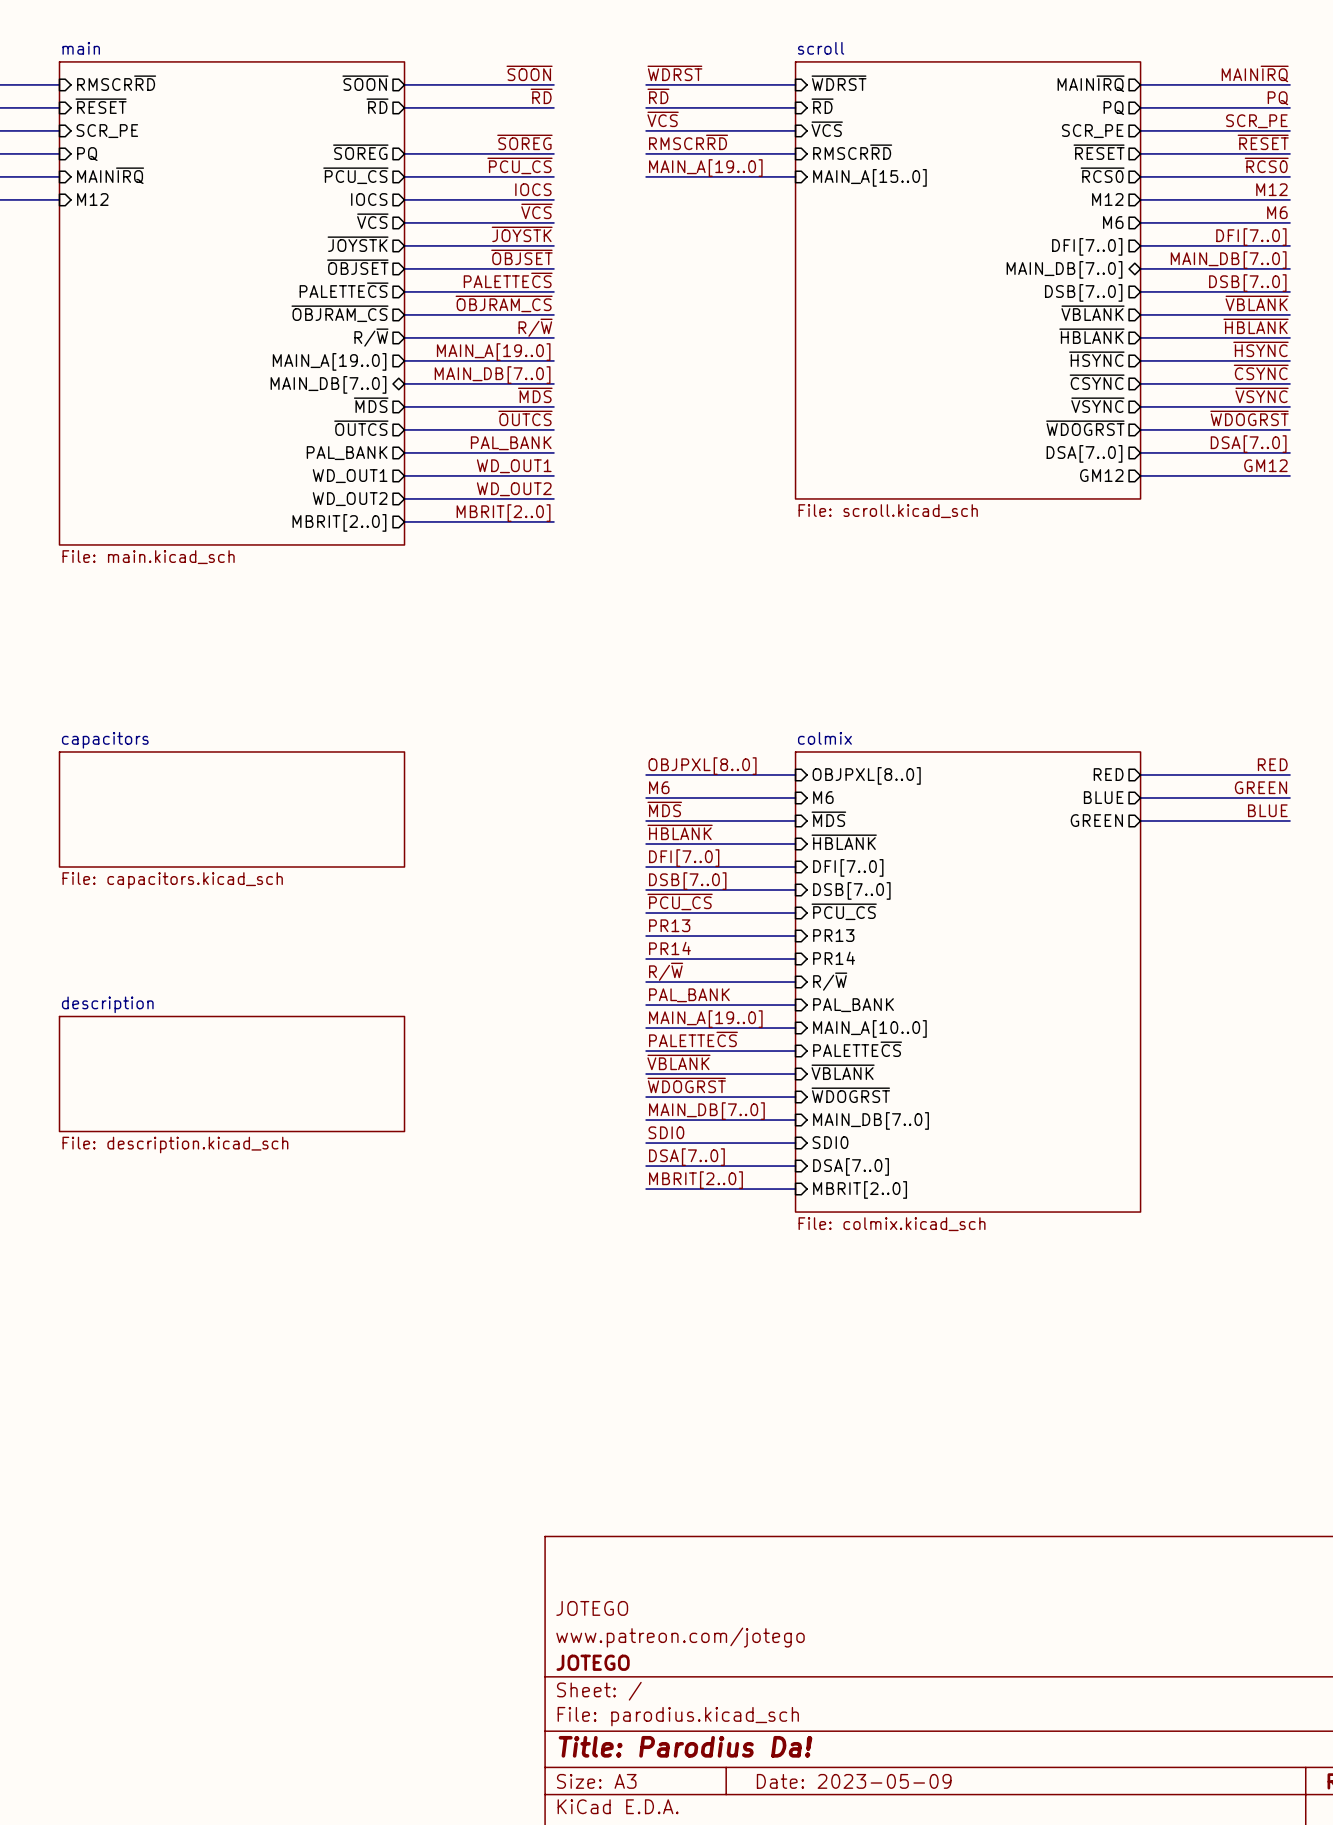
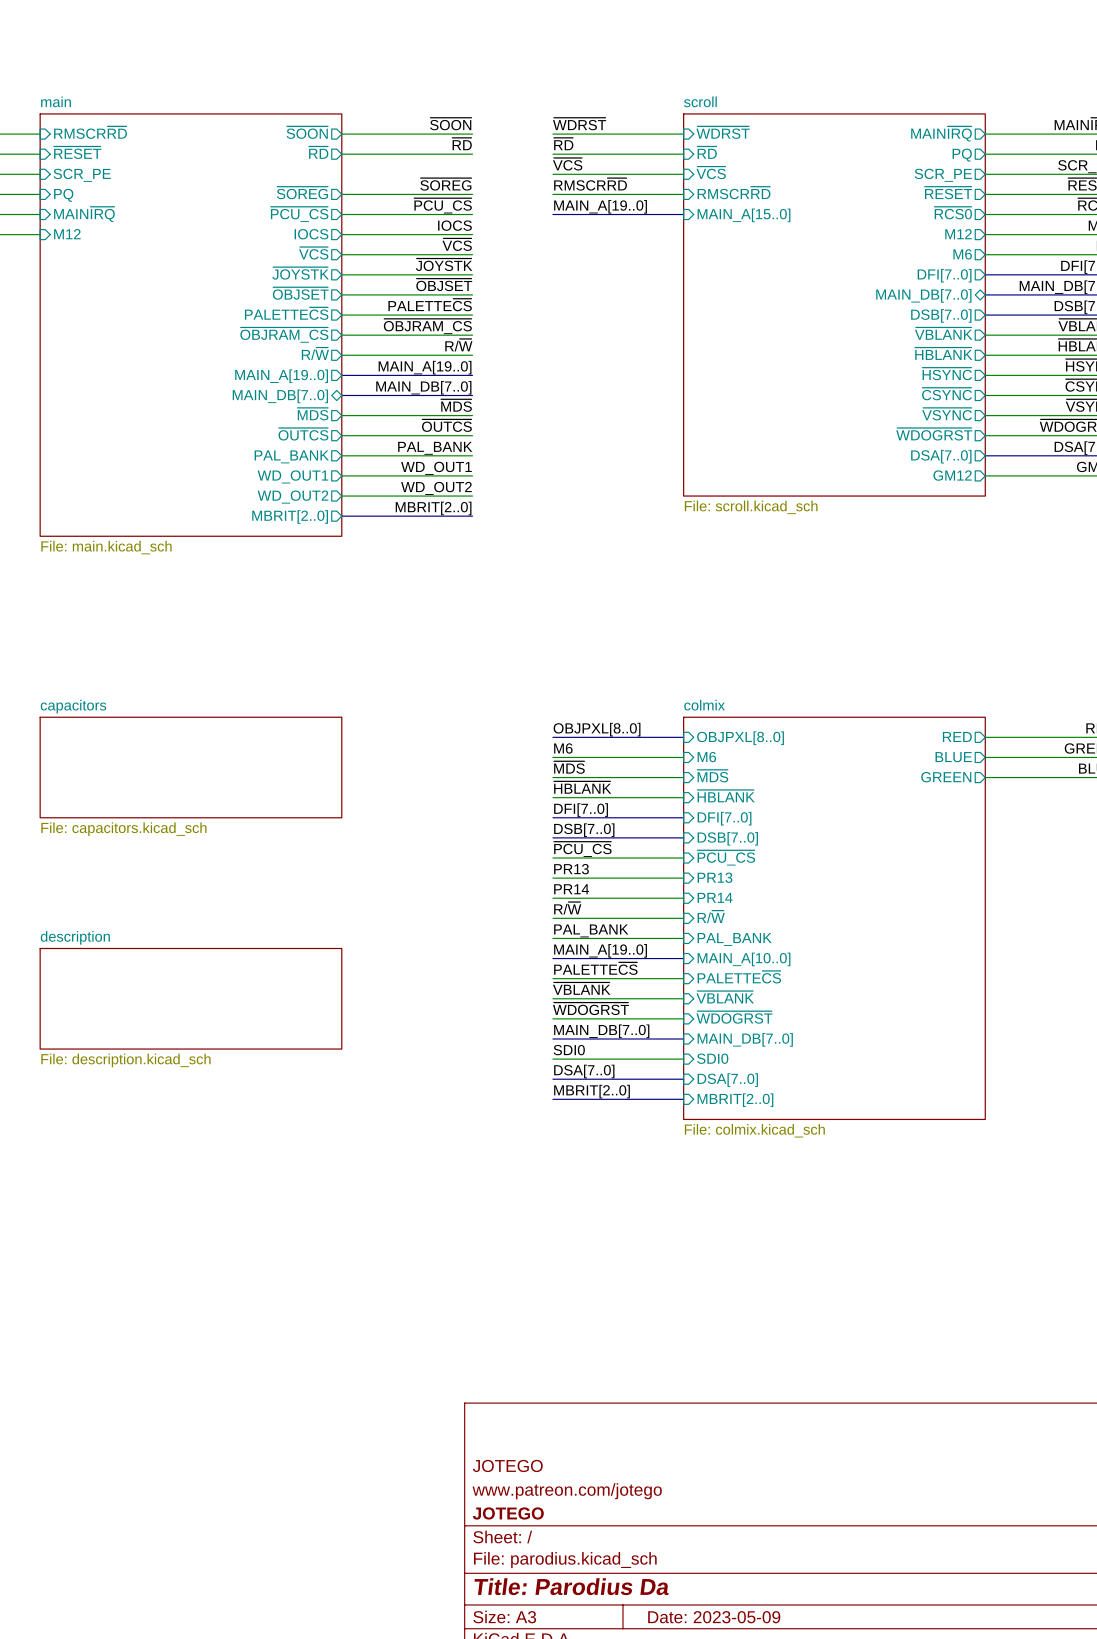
title block: Title: Parodius Da! (685, 1746) -> Title: Parodius Da (571, 1586)

